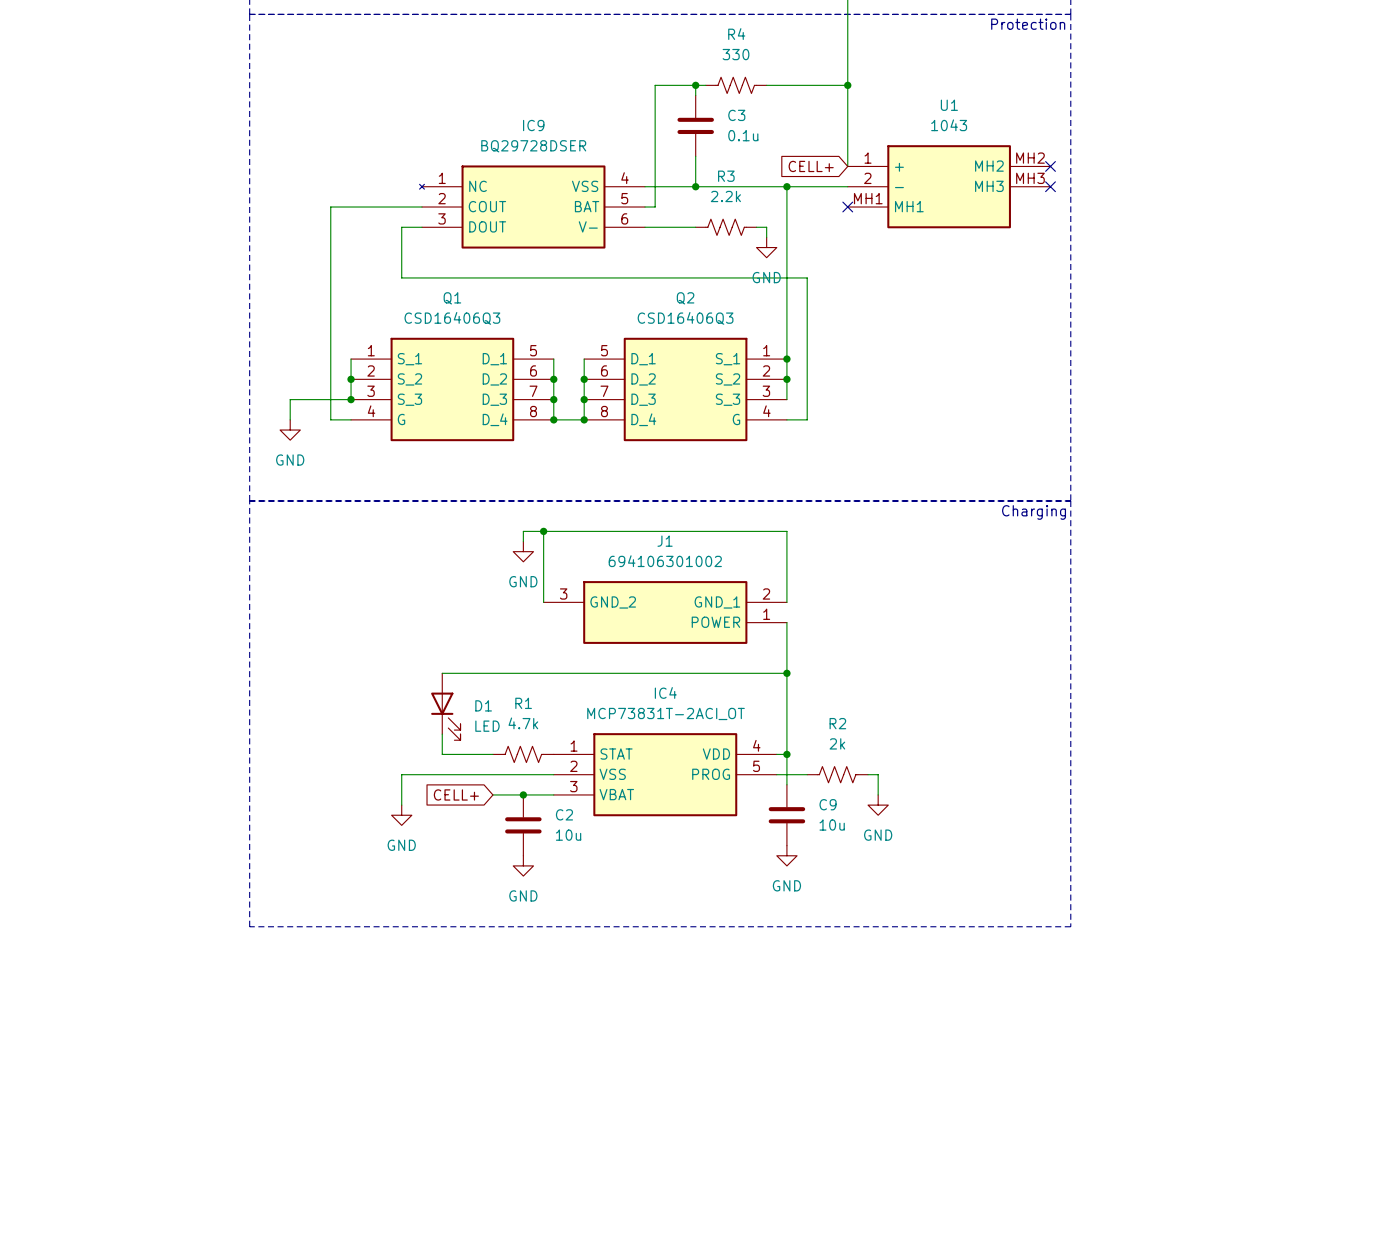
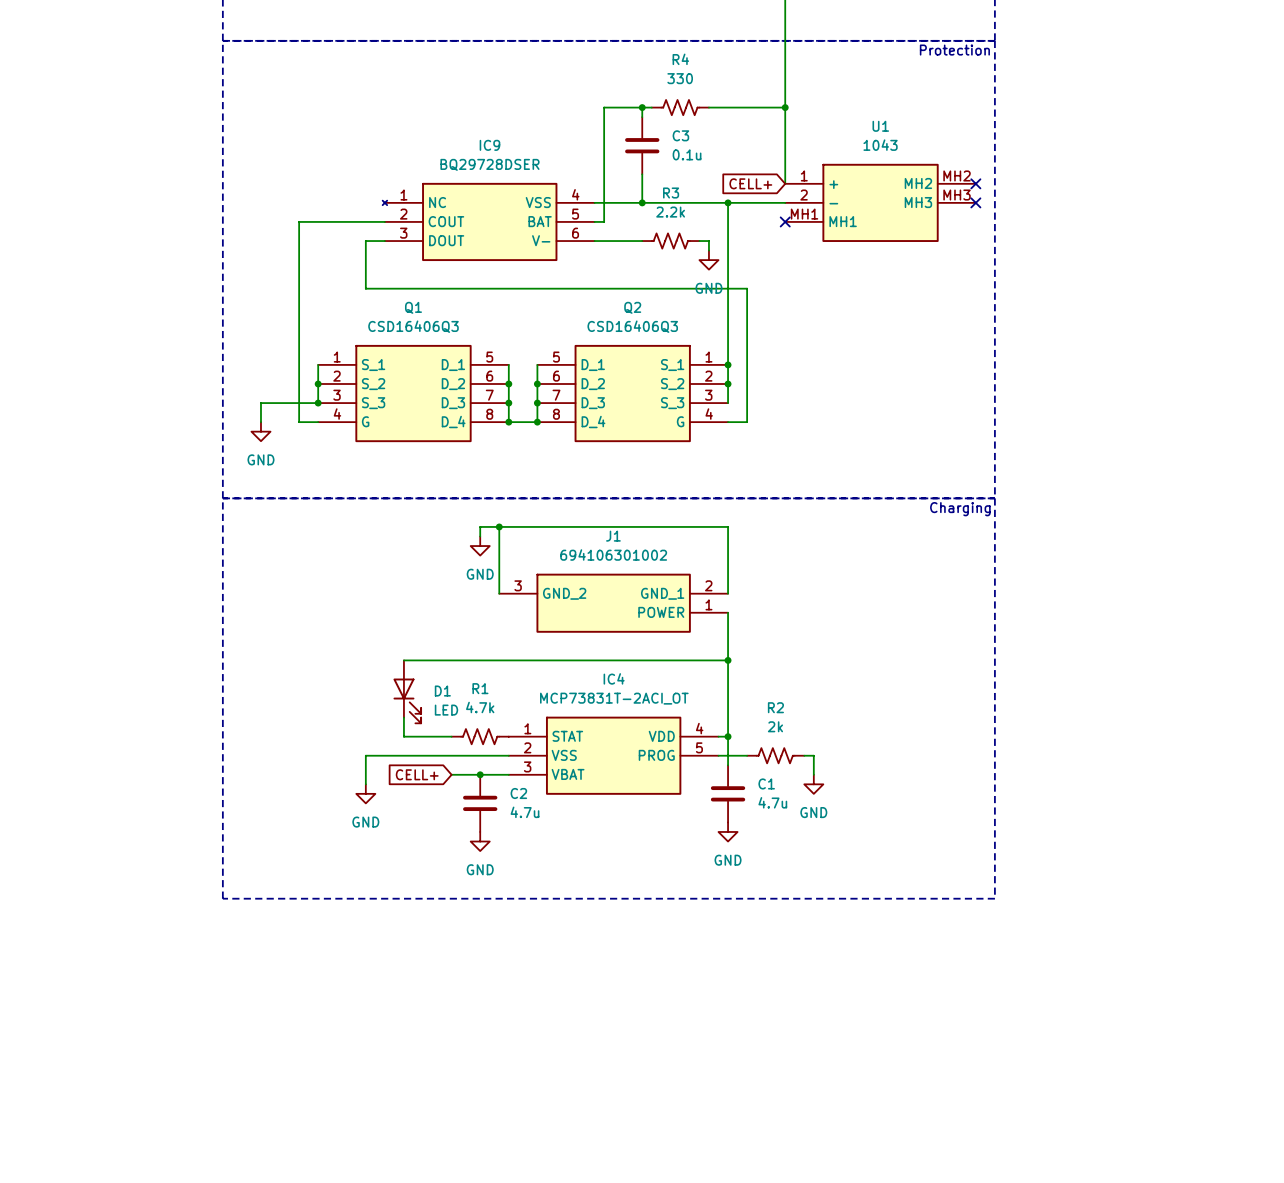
C9 name: C9 (828, 804) -> C1 (766, 783)
C9 value: 10u (832, 825) -> 4.7u (772, 802)
C2 value: 10u (568, 835) -> 4.7u (524, 812)

